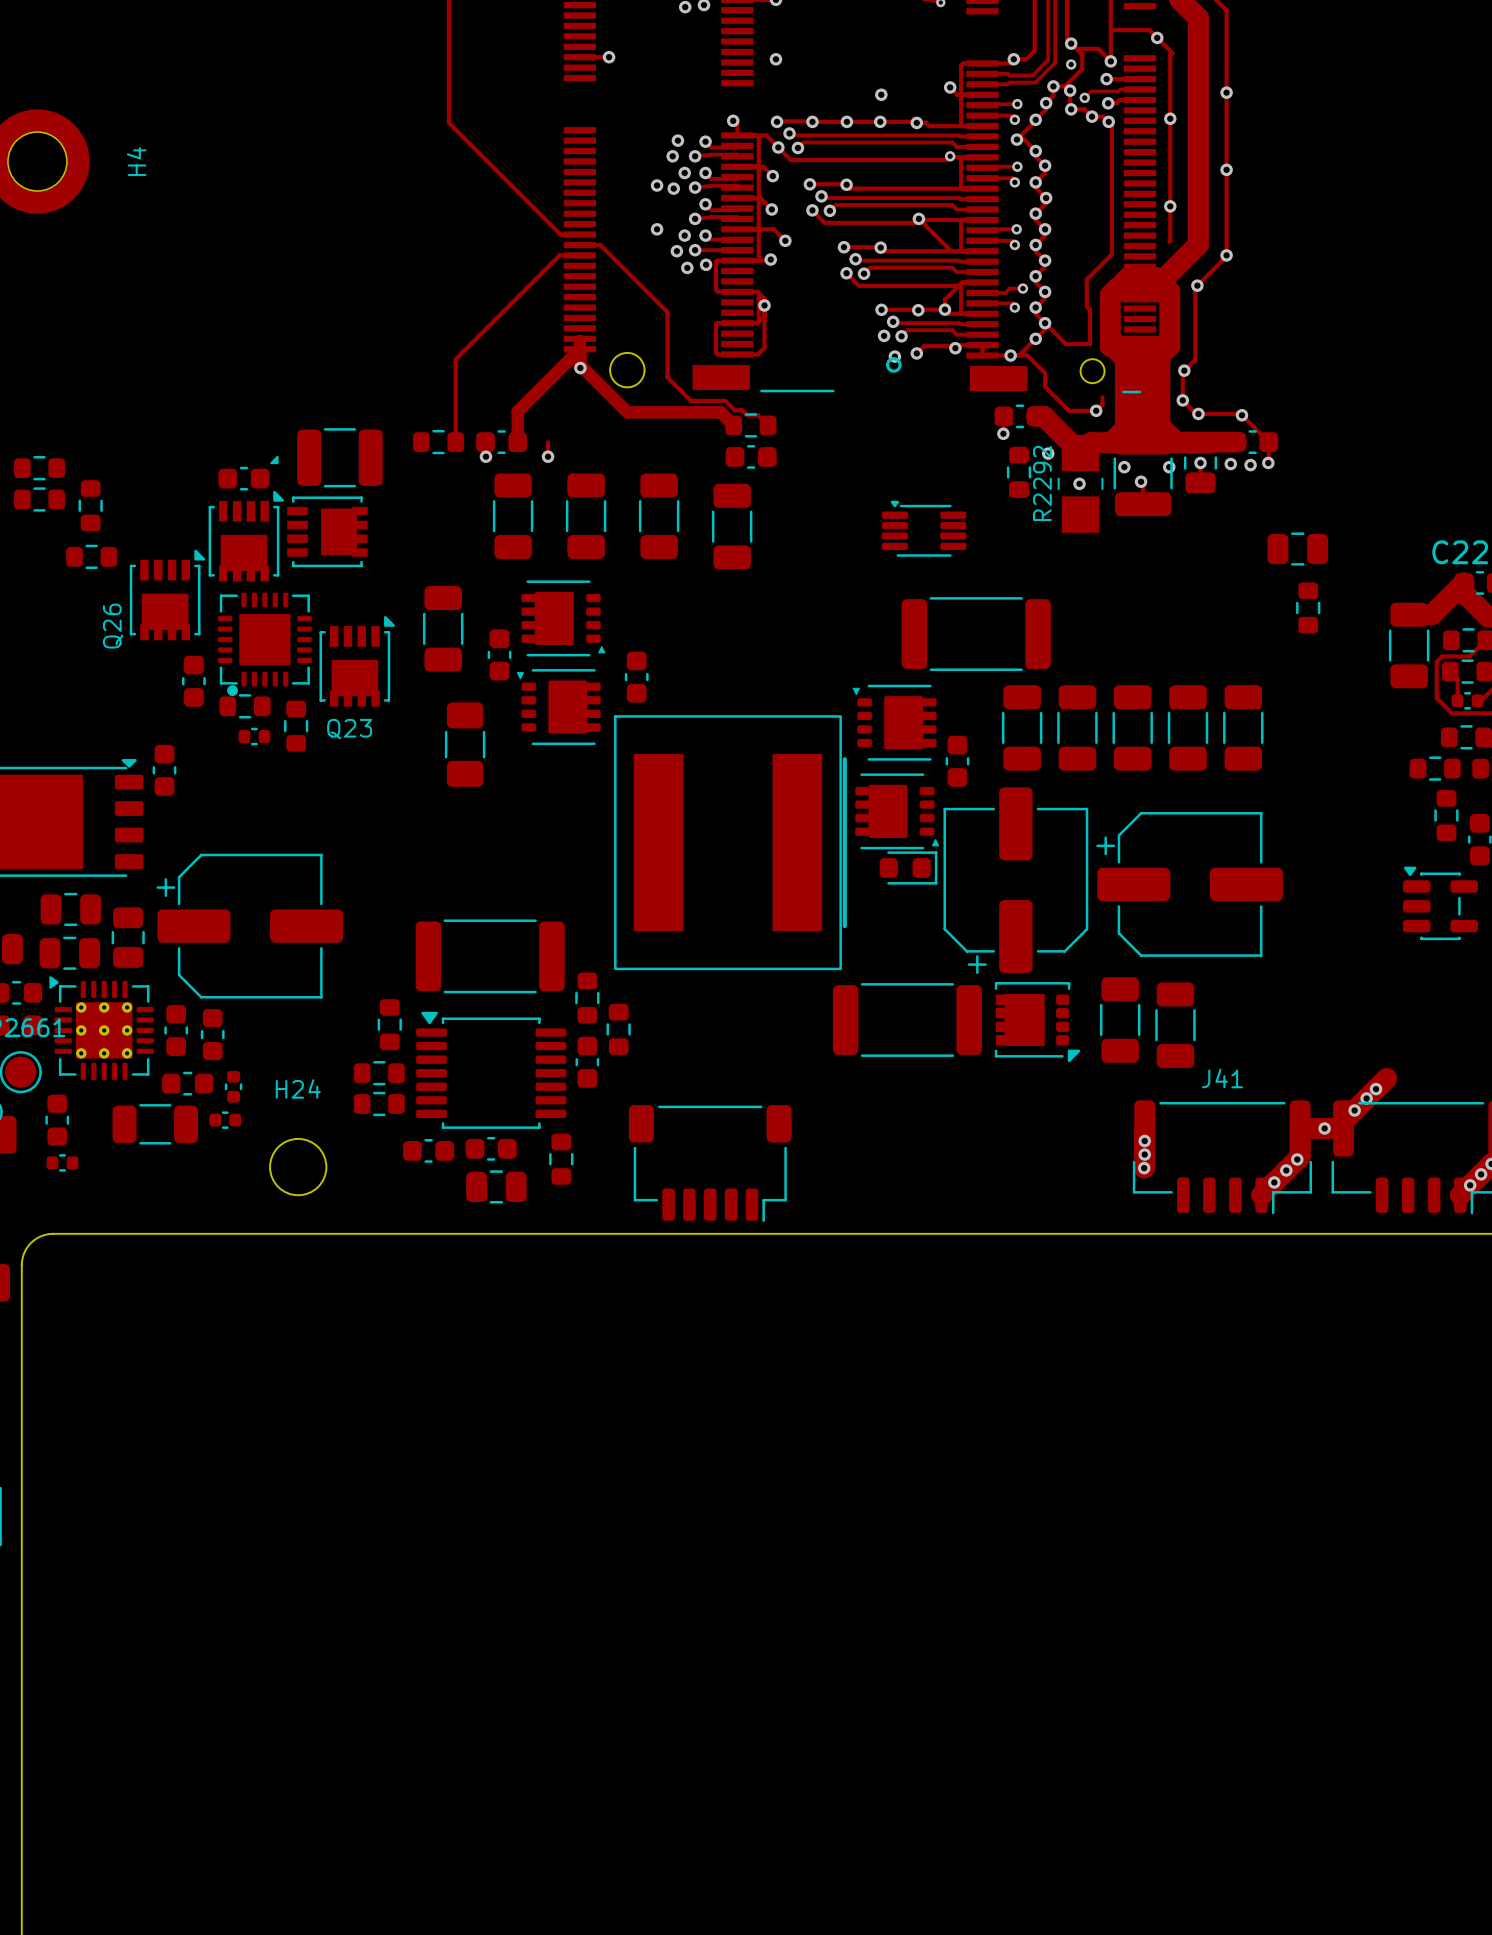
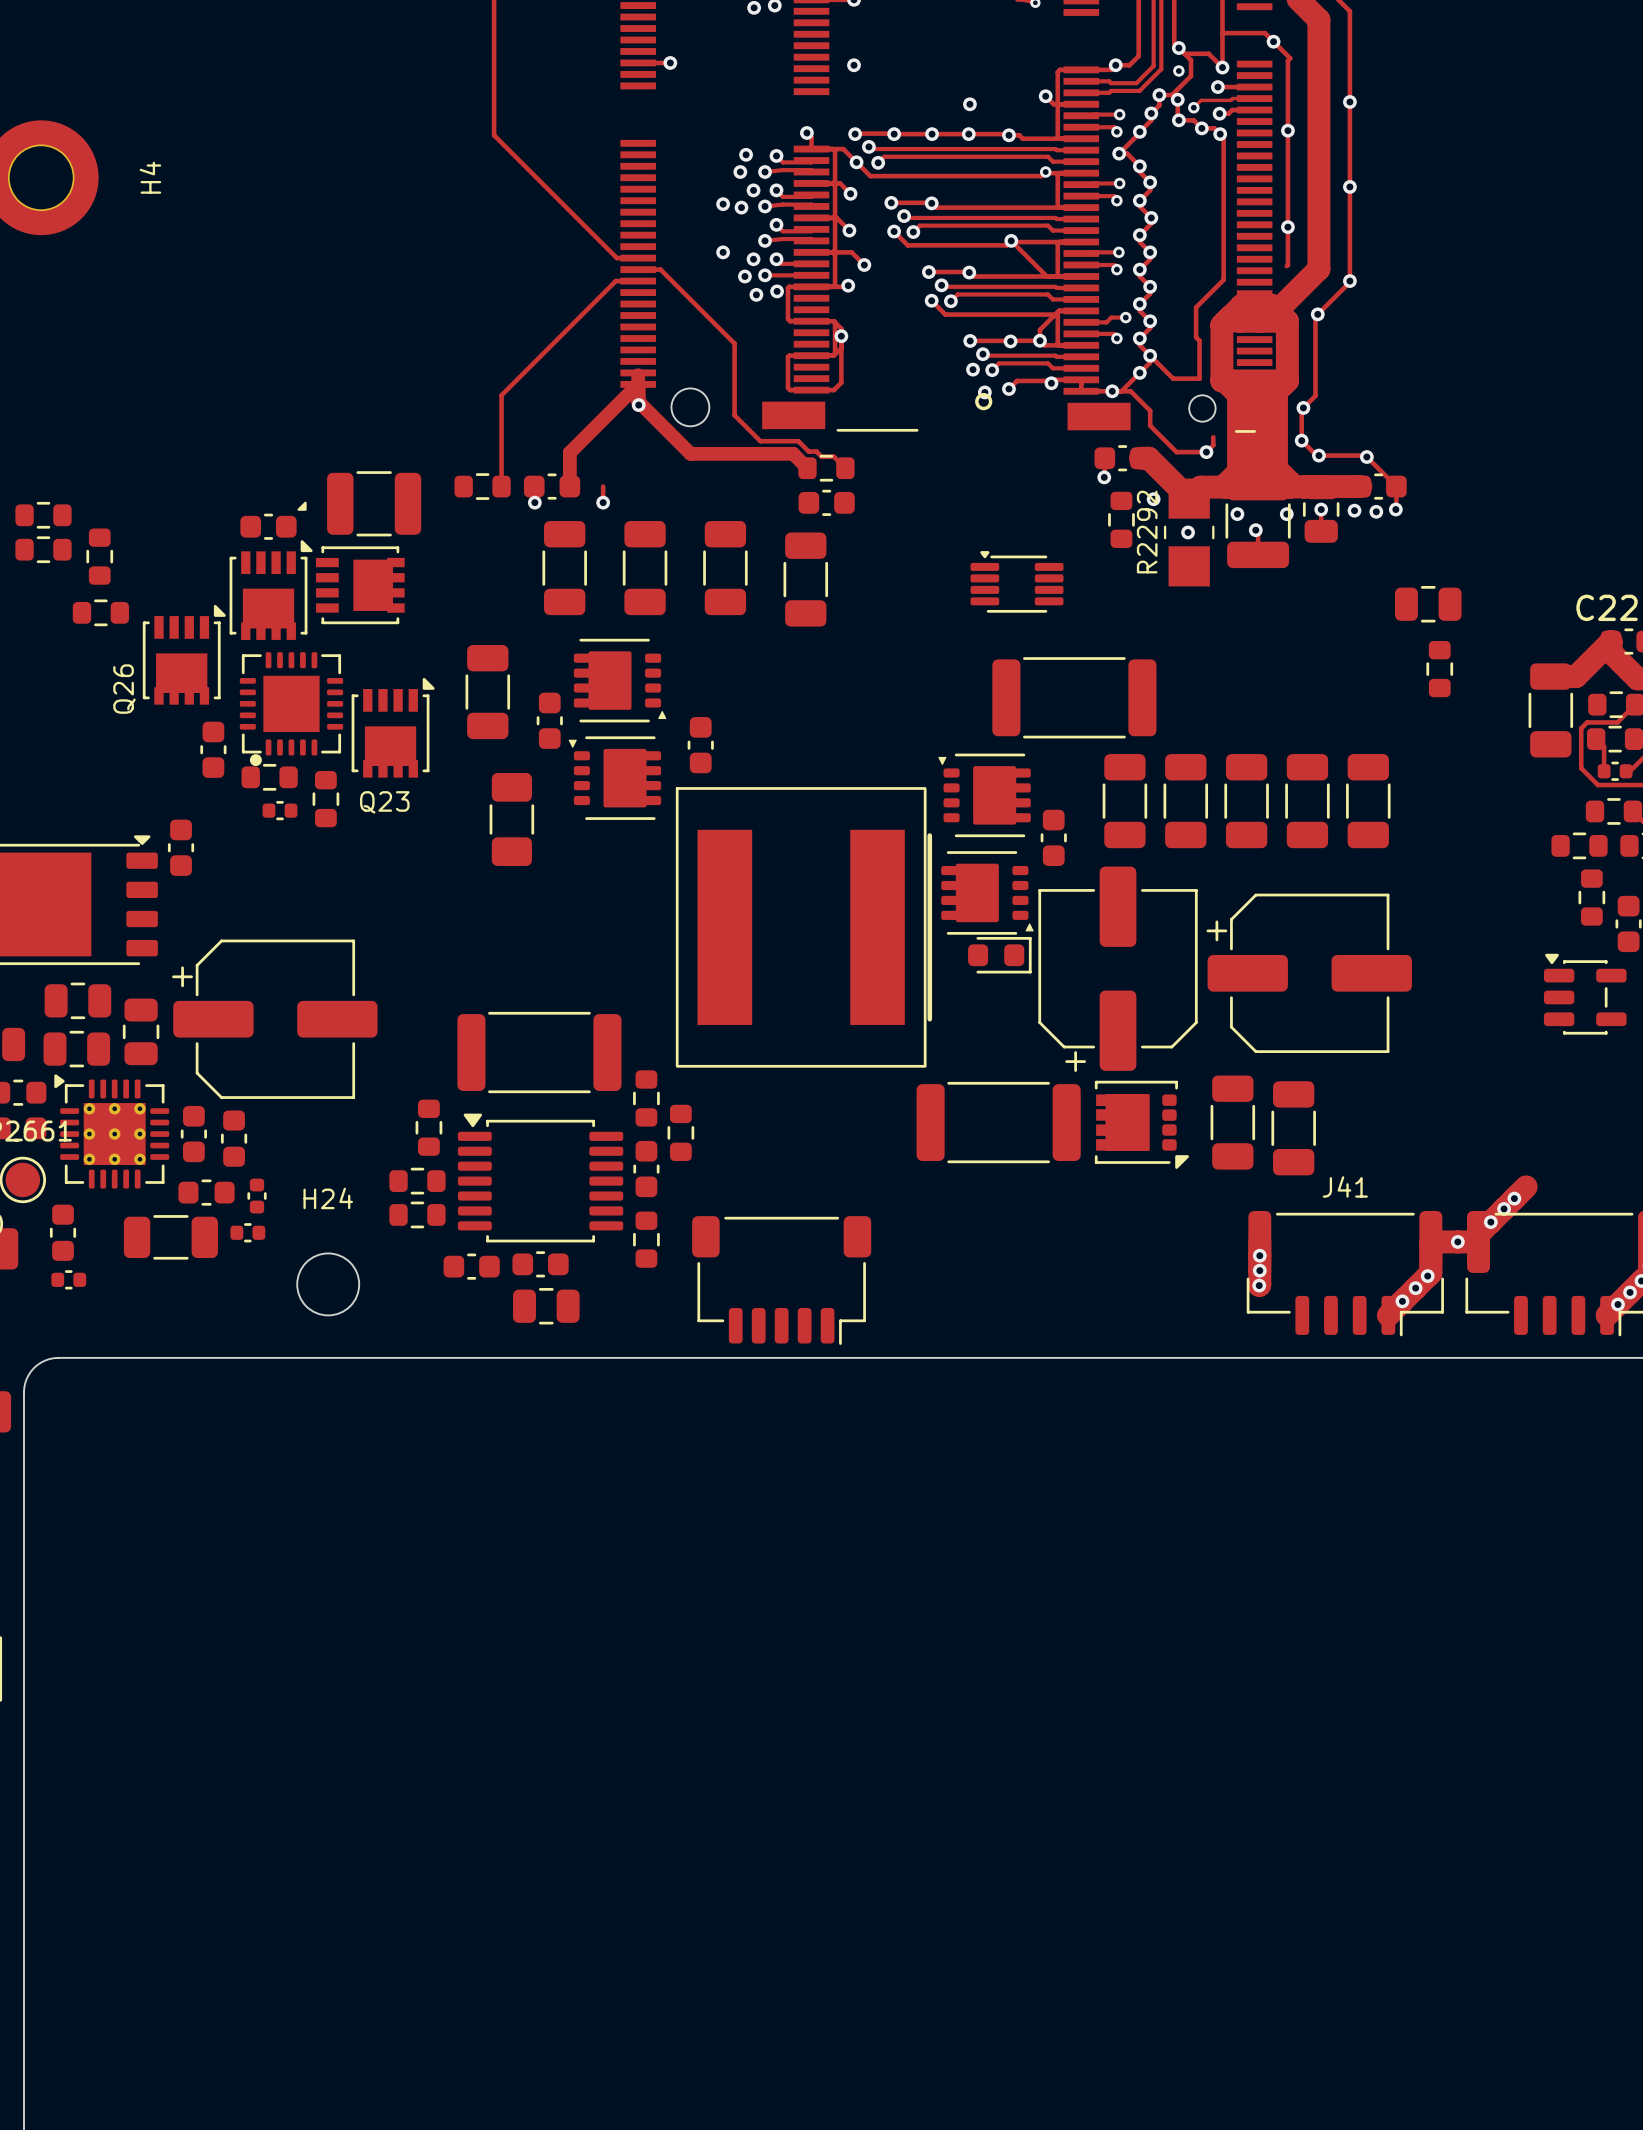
part position: (561, 1159) -> (646, 1239)

